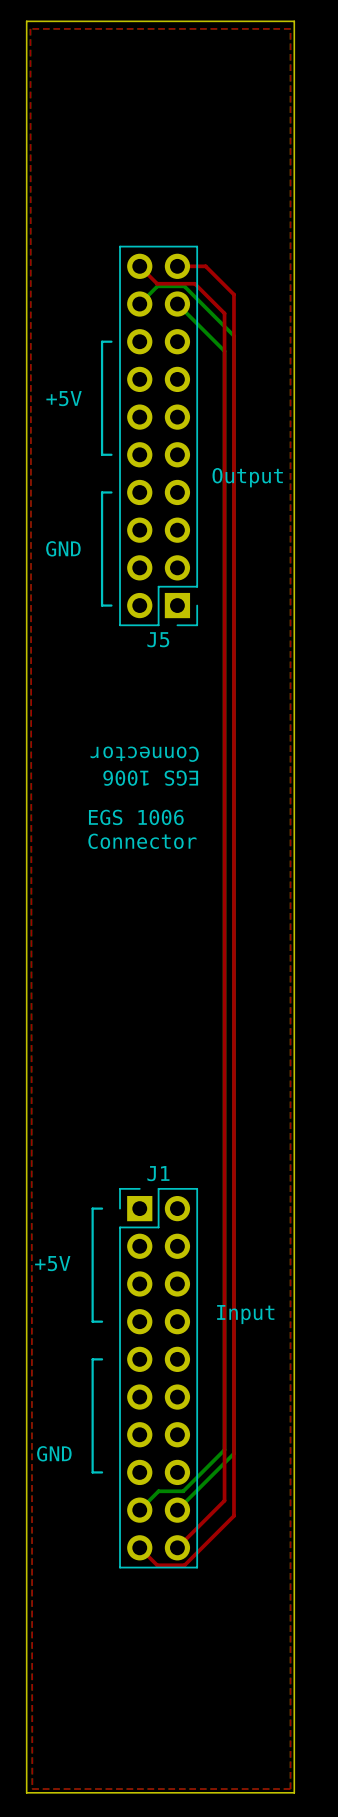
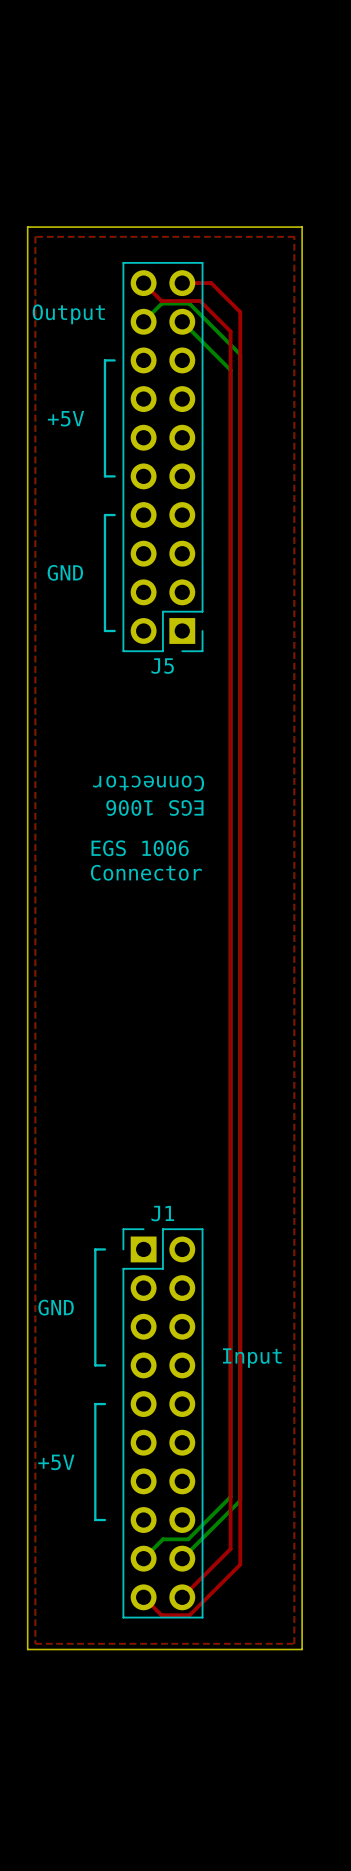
top zone outline: (30, 28) (32, 1789) (290, 1789) (290, 28) (30, 28) -> (35, 236) (35, 1643) (294, 1643) (294, 236) (35, 236)
board edge: (26, 211) (26, 21) (294, 21) (294, 211) -> (27, 227) (302, 227)
text position: Output (247, 477) -> Output (68, 314)
text position: +5V (52, 1263) -> +5V (56, 1462)
text position: GND (54, 1453) -> GND (56, 1307)
board edge: (26, 1598) (26, 1792) (294, 1792) (294, 1598) -> (27, 1649) (302, 1649)

